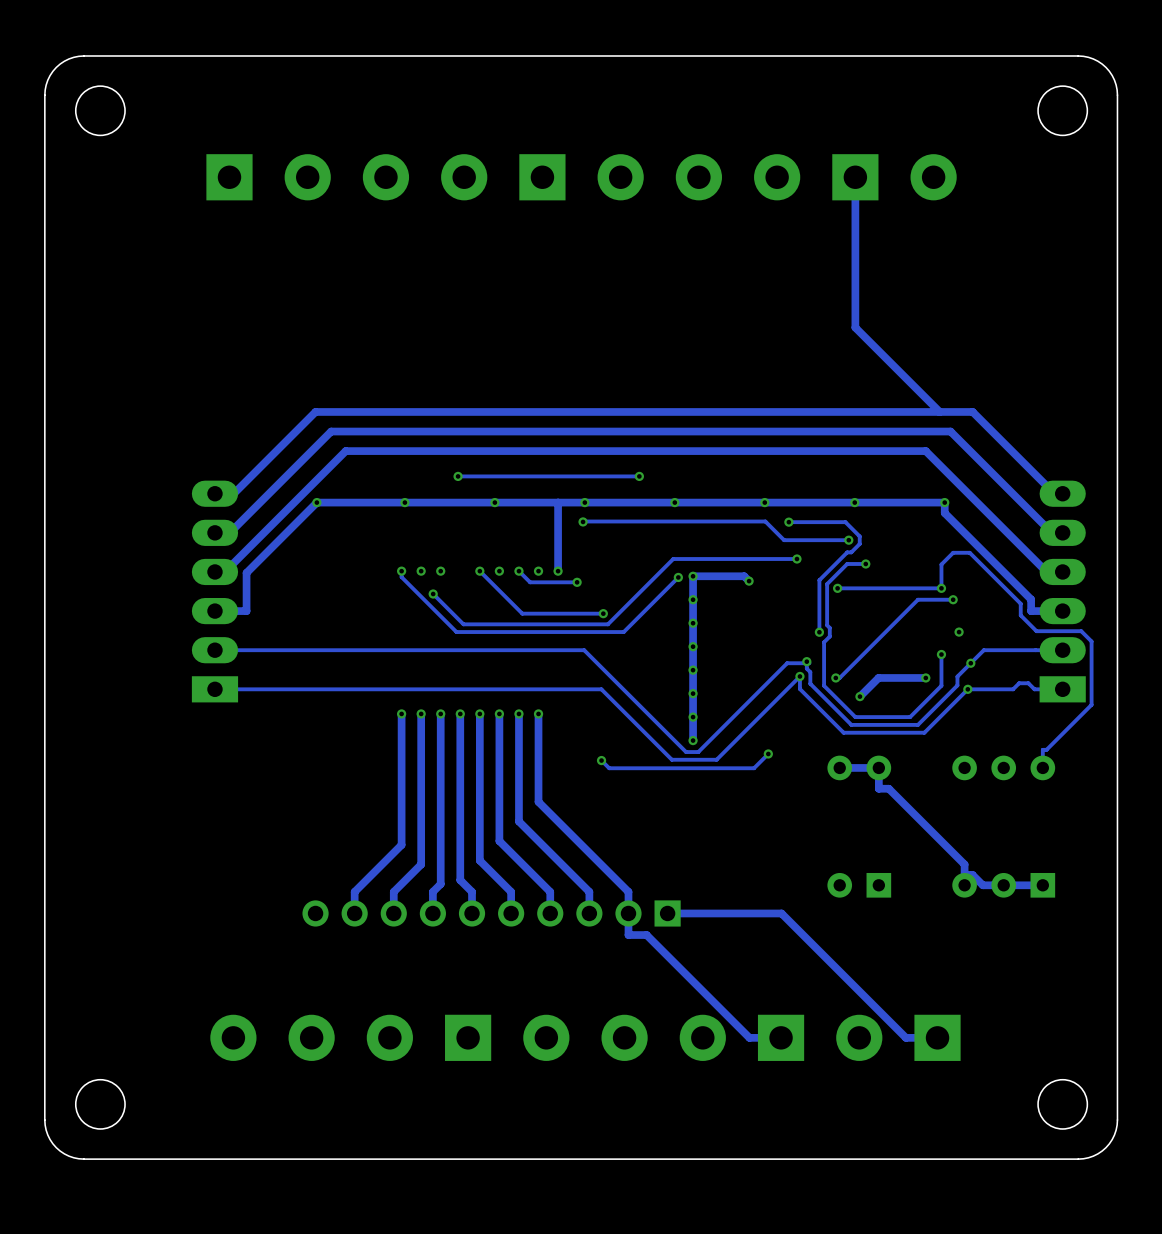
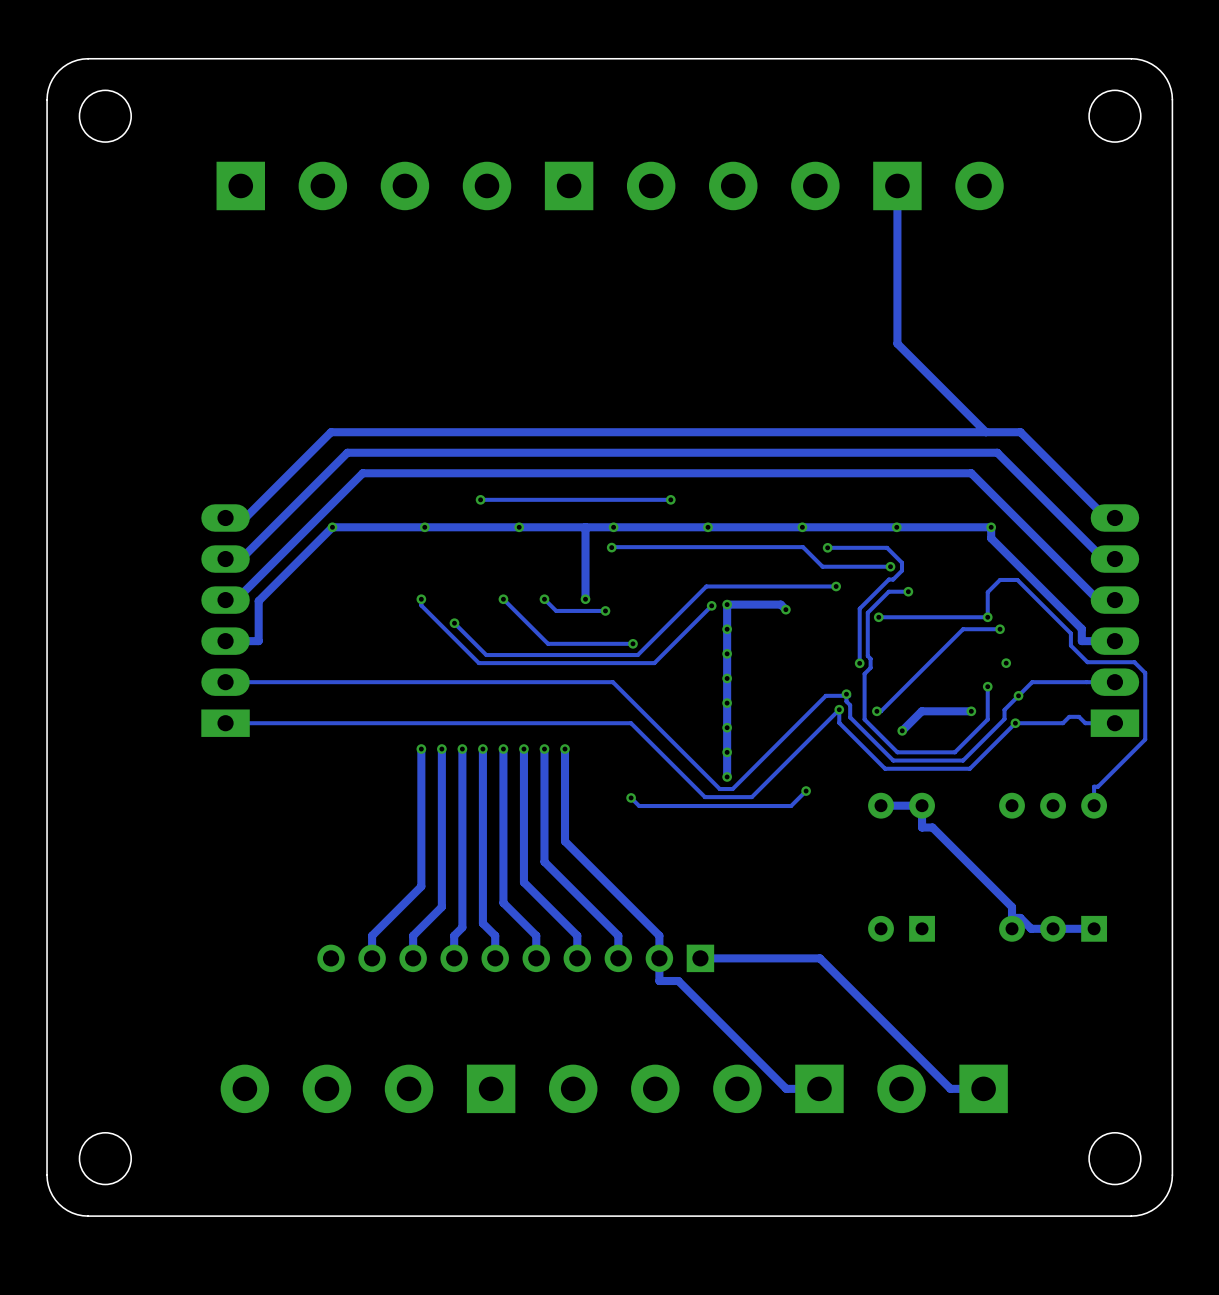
via: (421, 571) -> none
via: (440, 571) -> none
via: (499, 571) -> none
via: (538, 571) -> none

